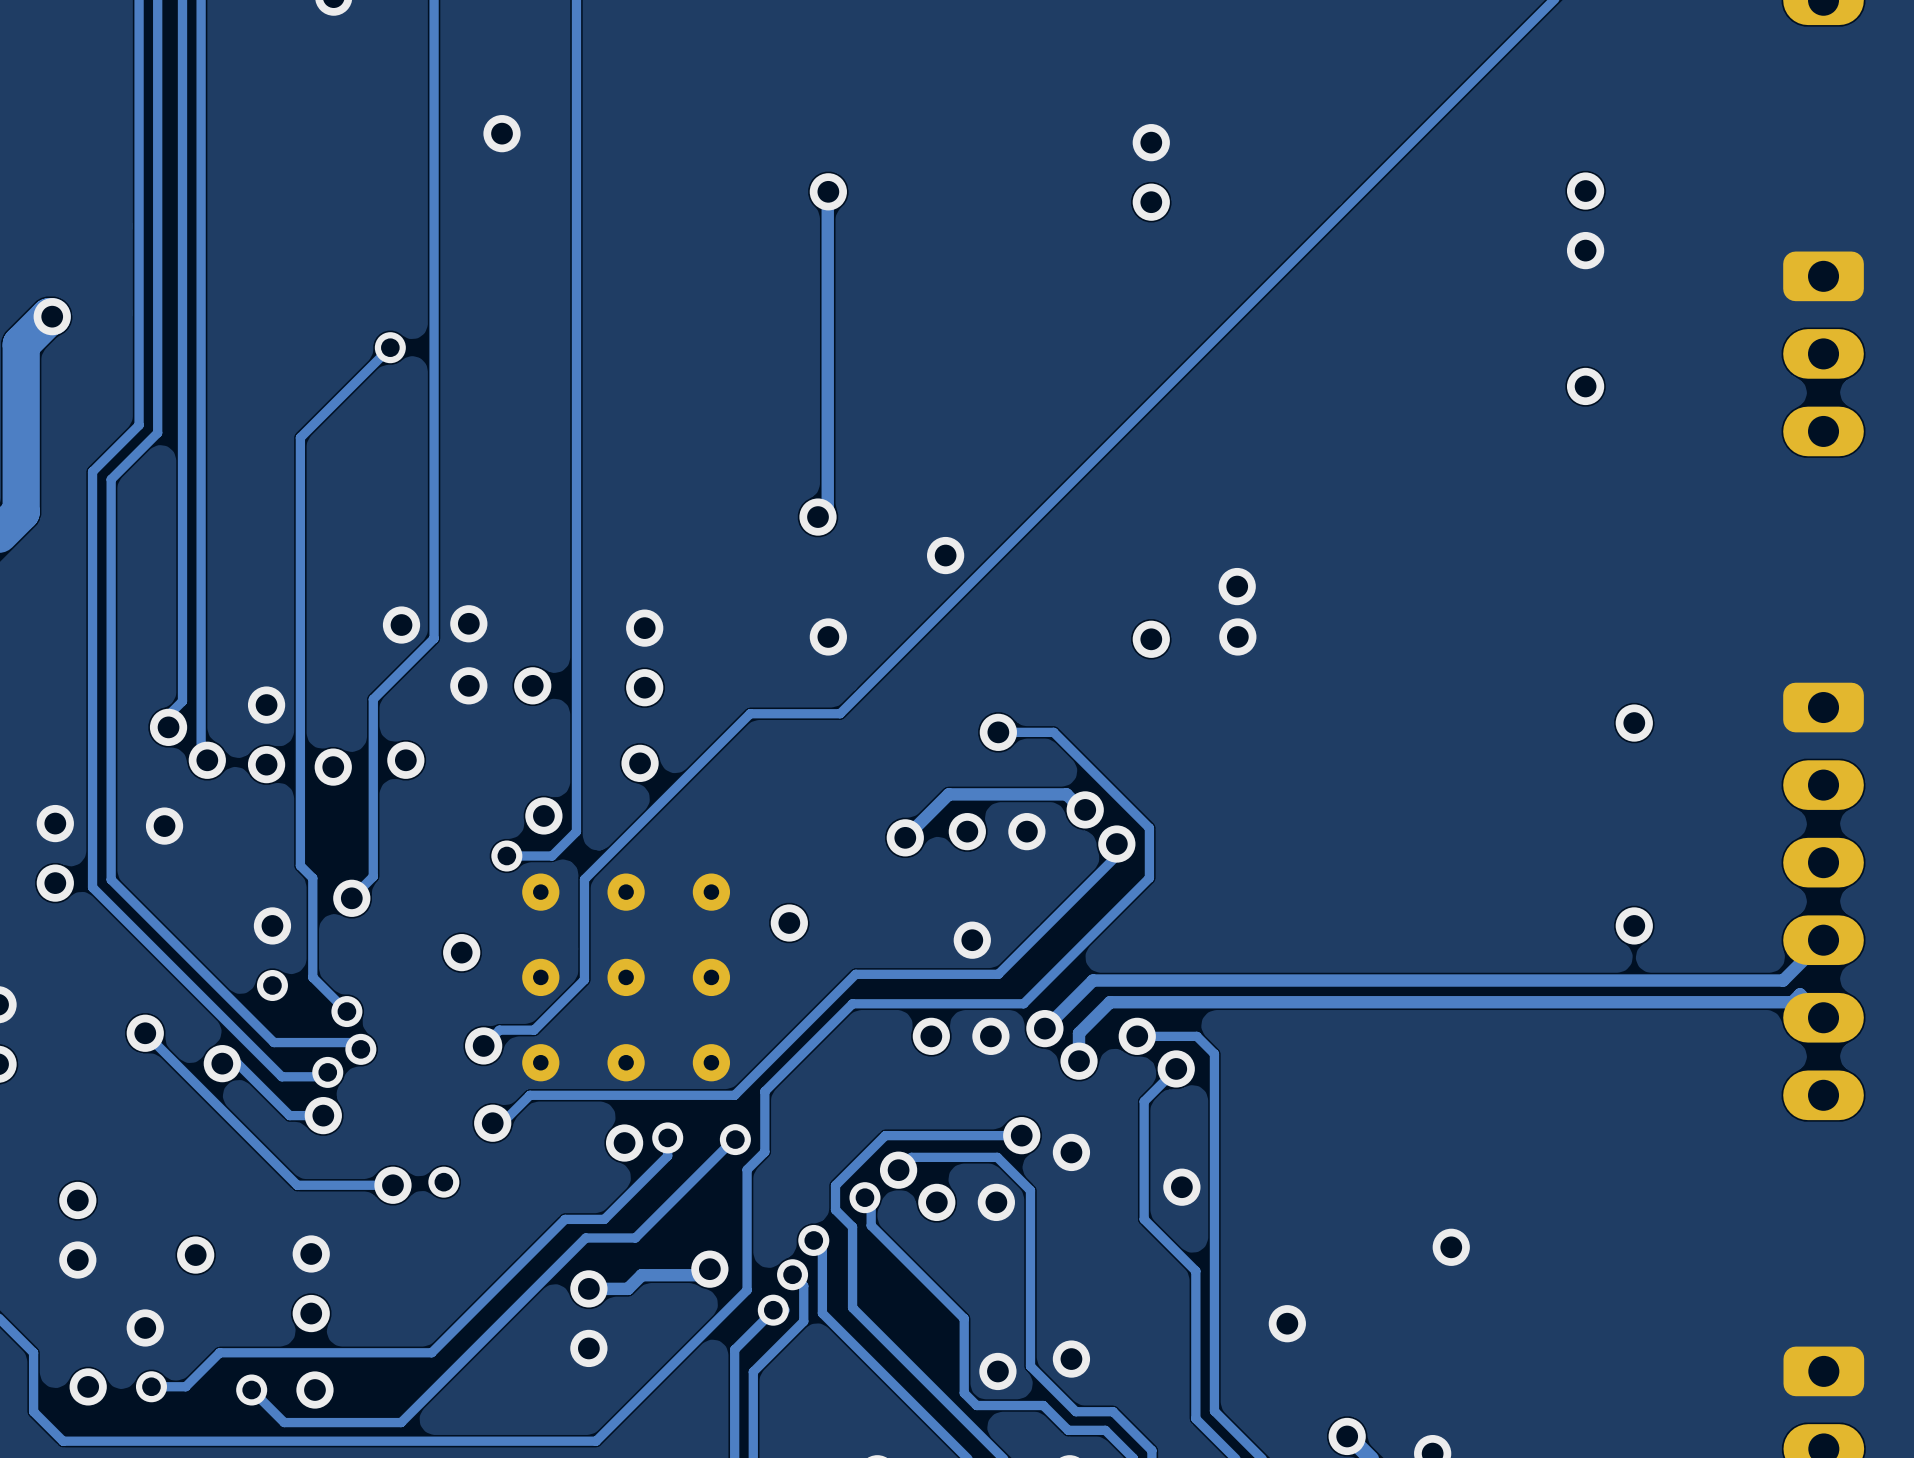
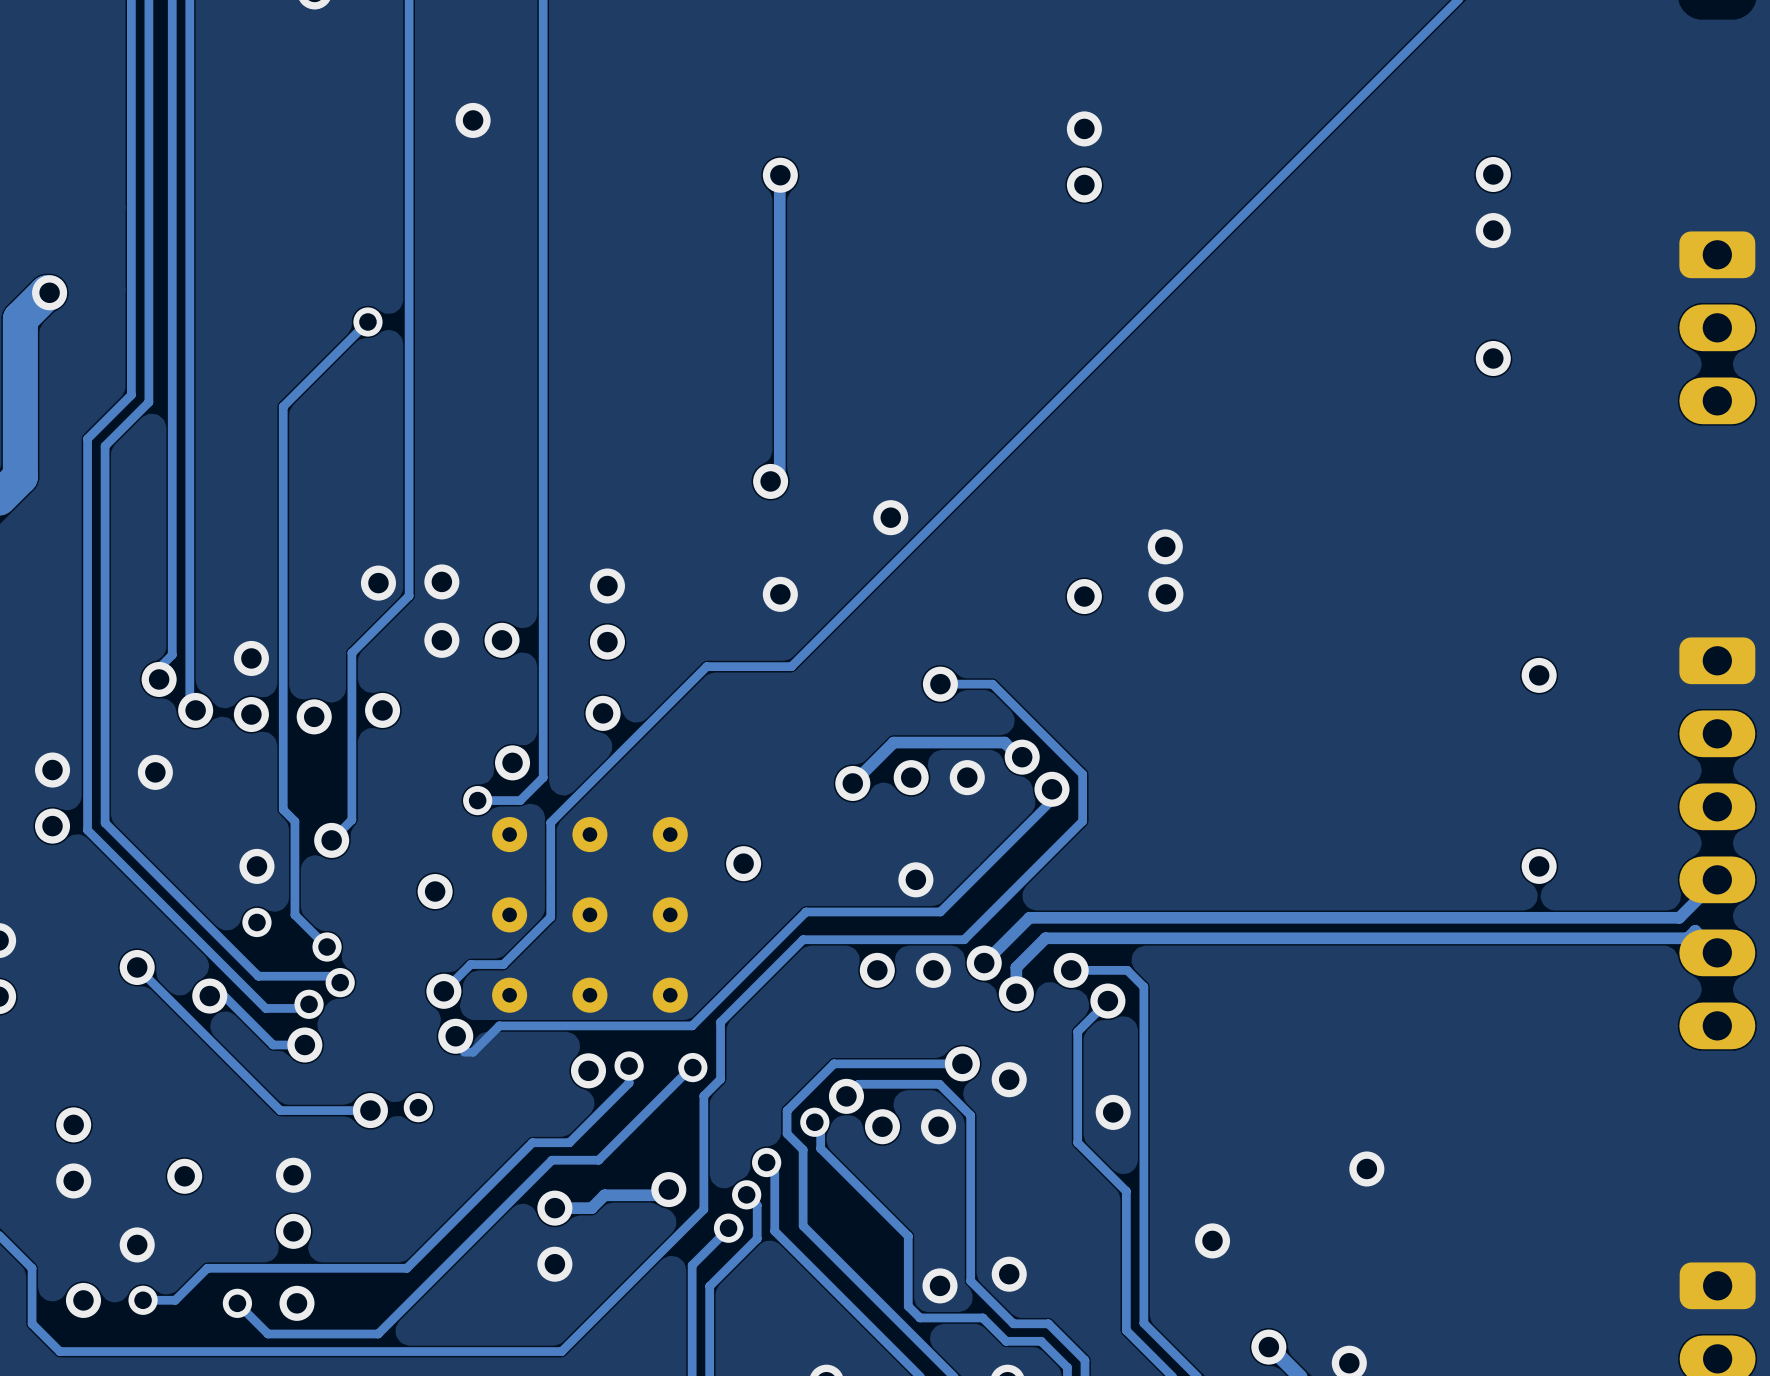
via position: (483, 1045) -> (443, 991)
via position: (492, 1123) -> (455, 1036)

